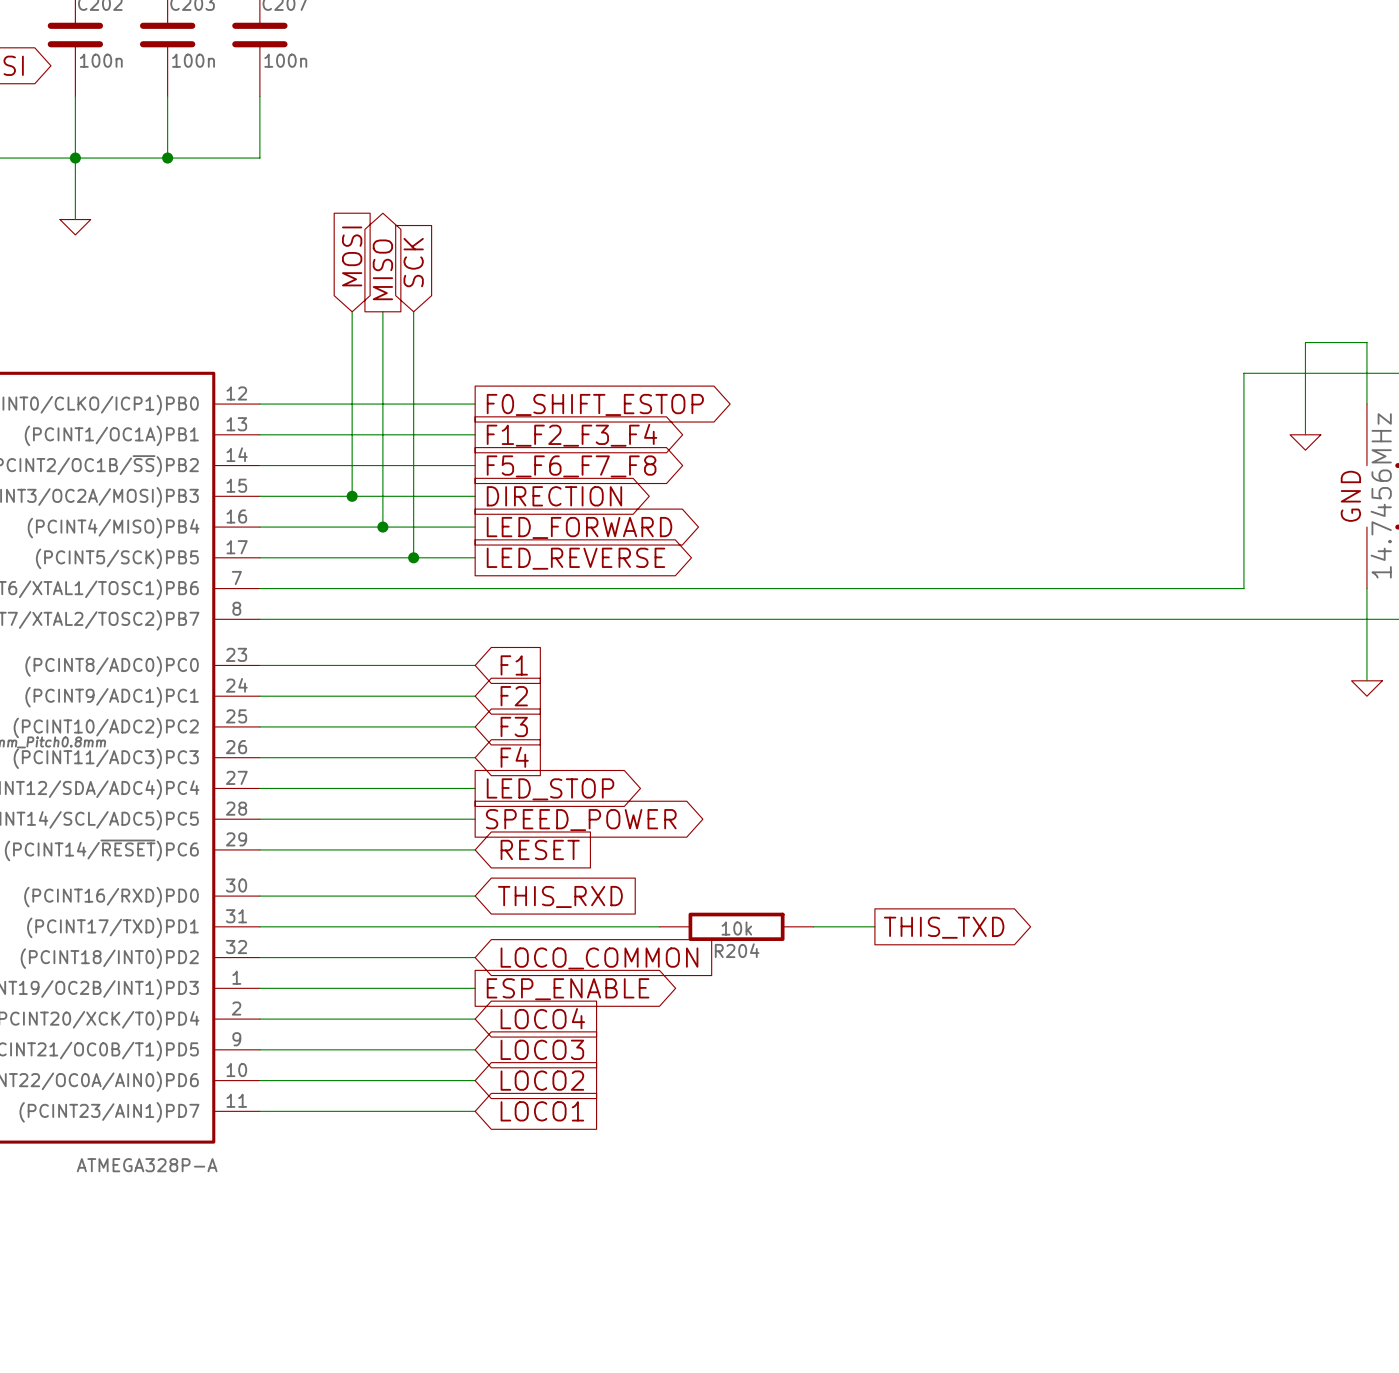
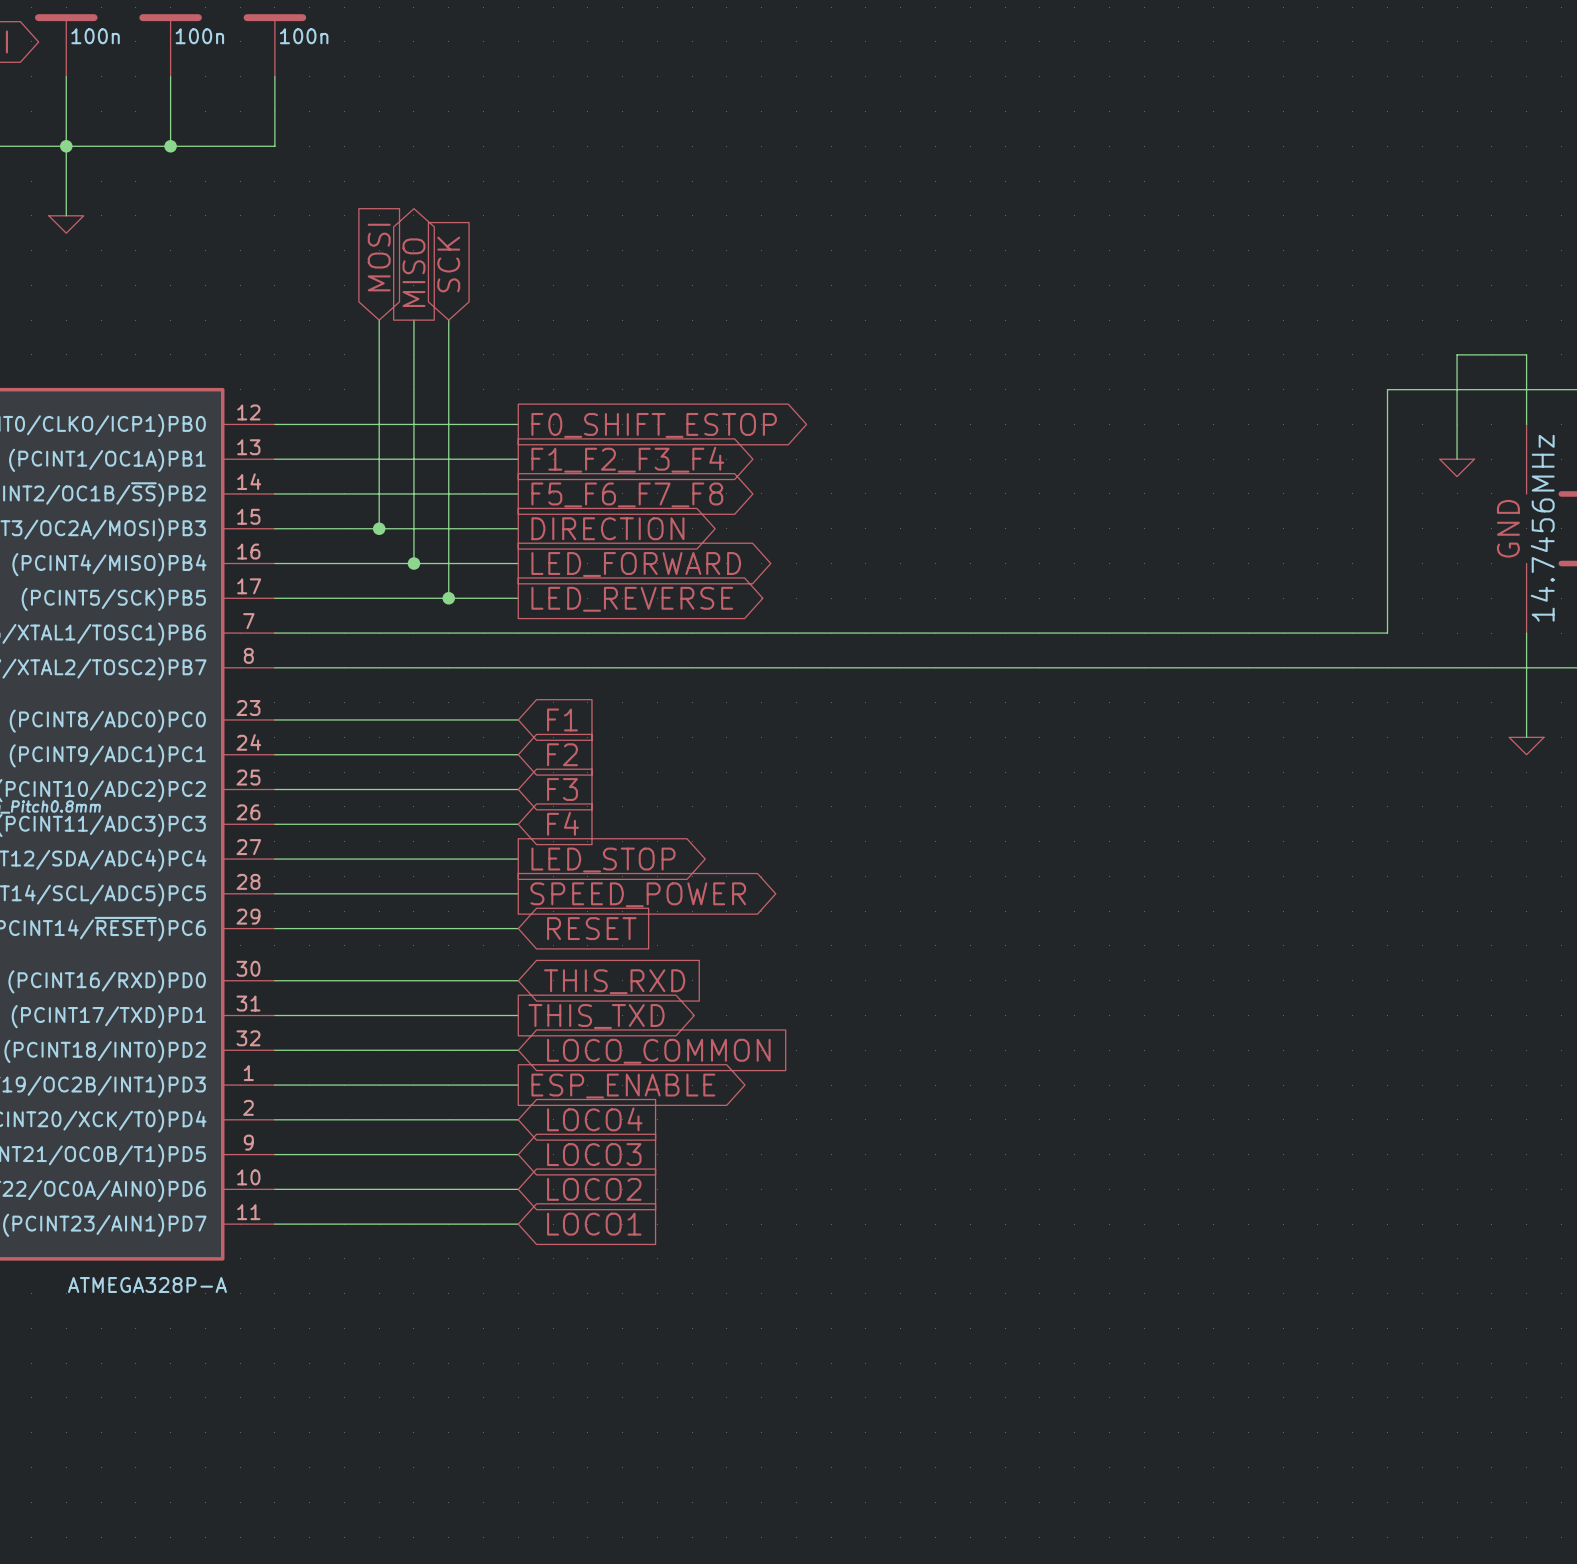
wire: (475, 926) (659, 926) -> none
R204: 10k (736, 926) -> none
wire: (813, 926) (874, 926) -> none
global label: none -> THIS_TXD (596, 1016)
global label: THIS_TXD (944, 927) -> none

